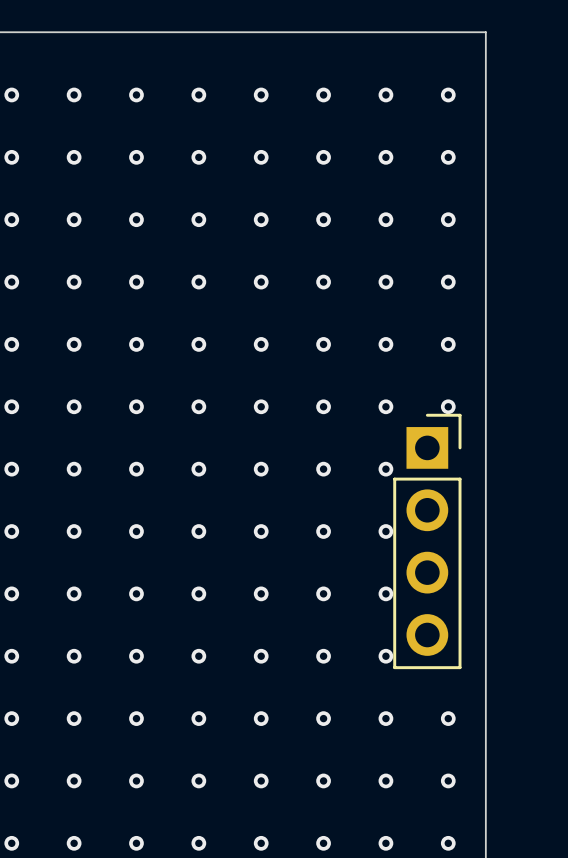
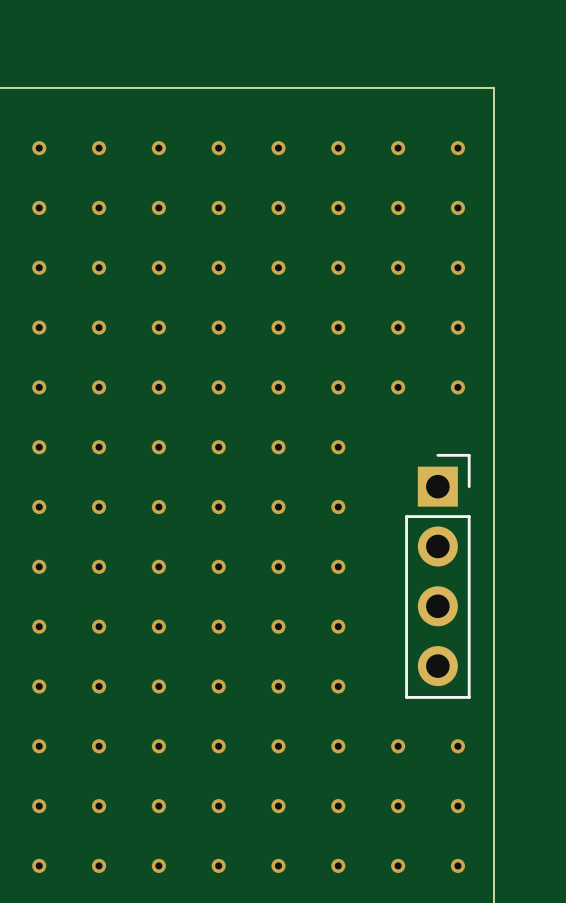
via: (385, 406) -> none
via: (448, 406) -> none
via: (385, 469) -> none
via: (385, 531) -> none
via: (385, 593) -> none
via: (385, 656) -> none

